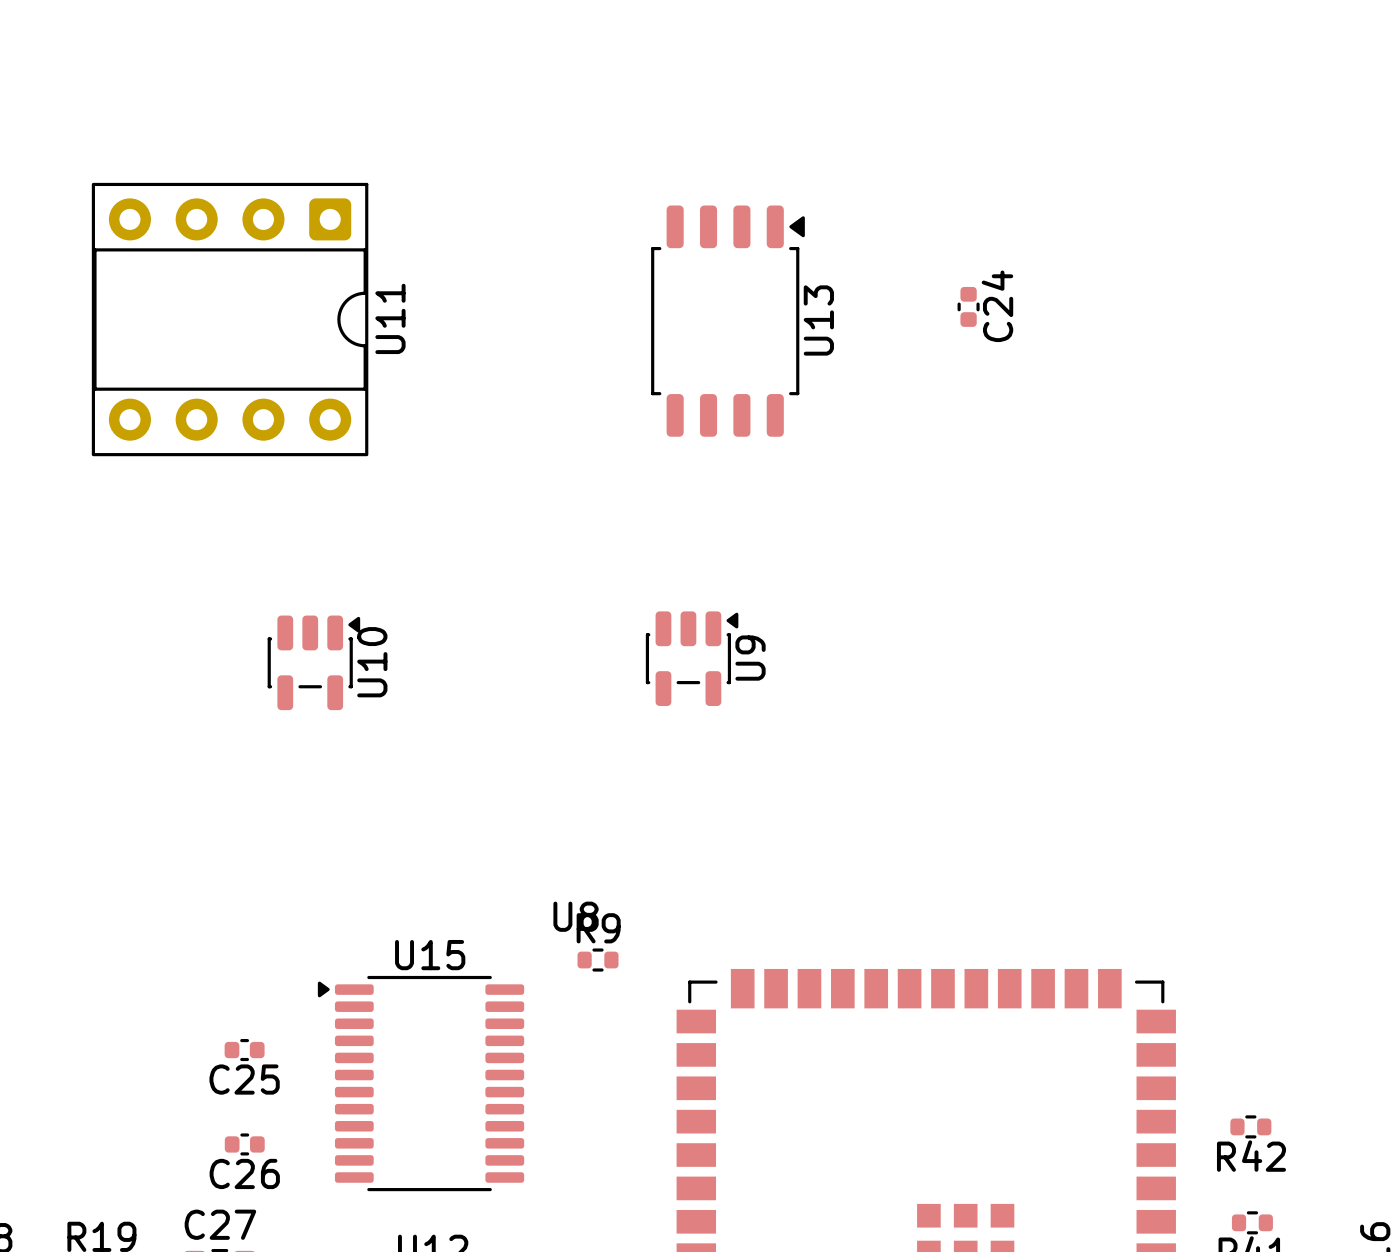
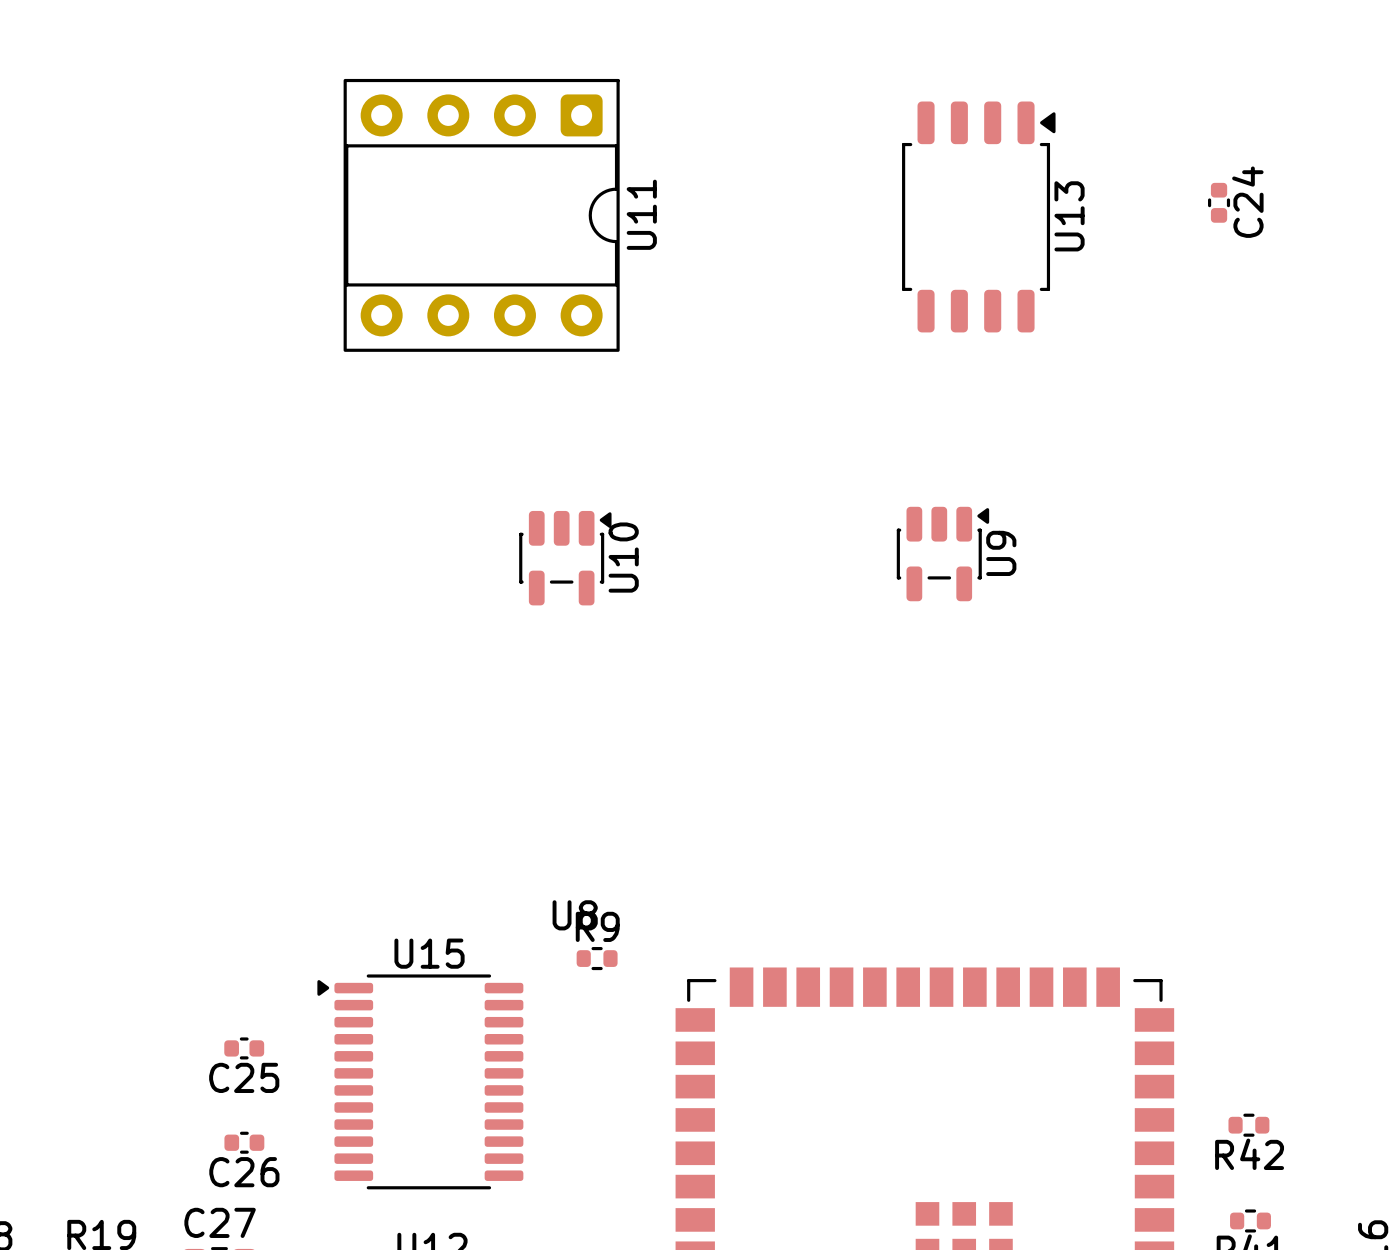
C24 position: (968, 306) -> (1219, 202)
U11 position: (230, 319) -> (481, 215)
U13 position: (727, 321) -> (978, 216)
U9 position: (692, 658) -> (942, 554)
U10 position: (313, 662) -> (565, 558)

